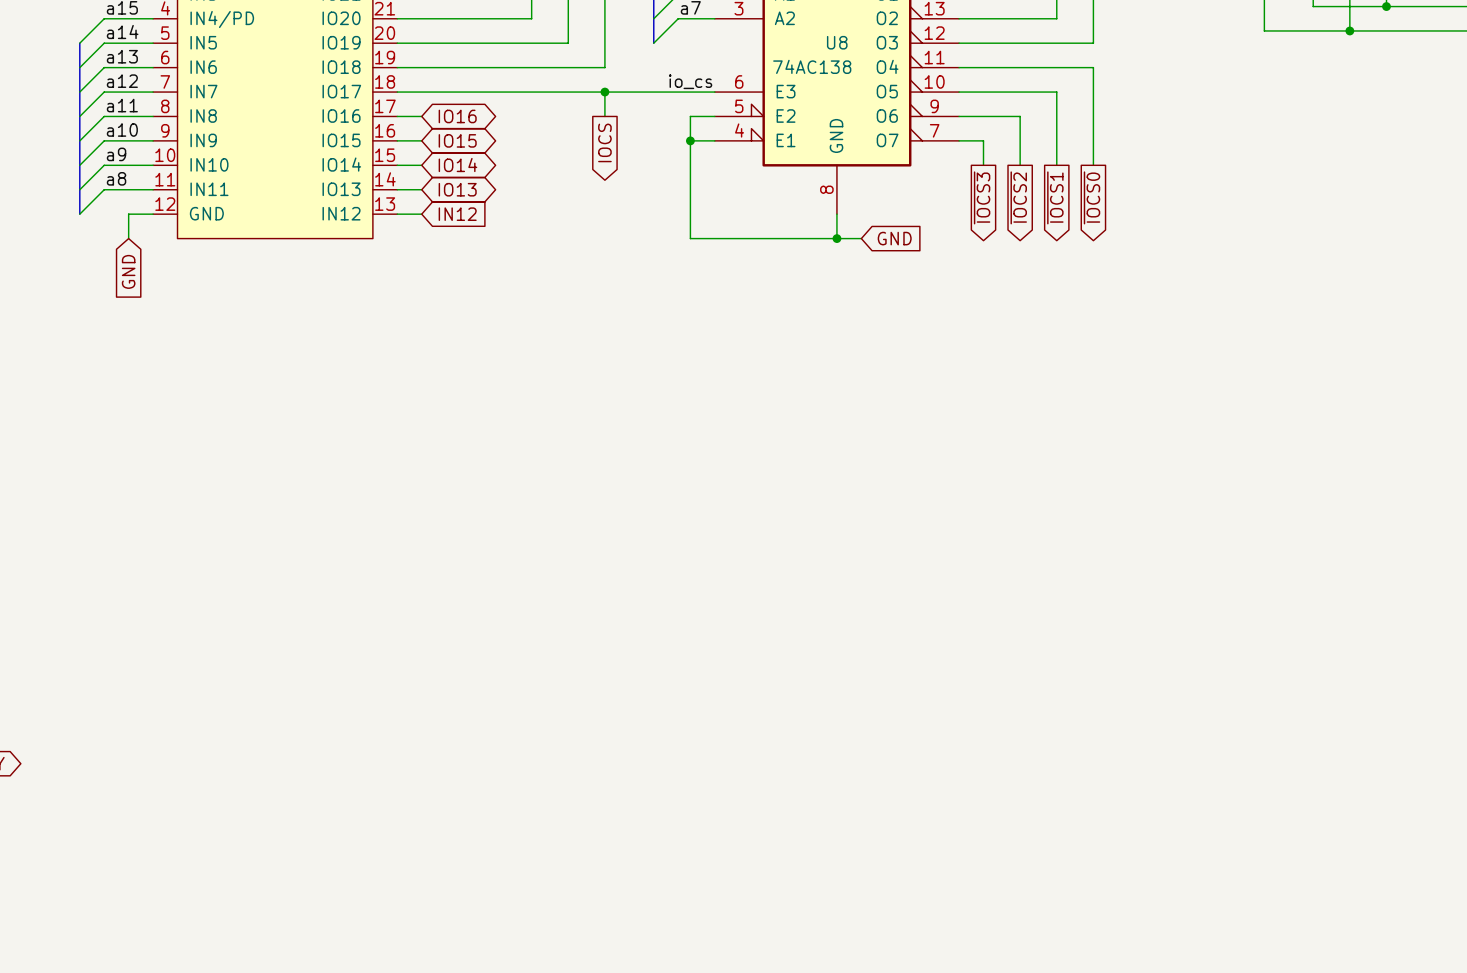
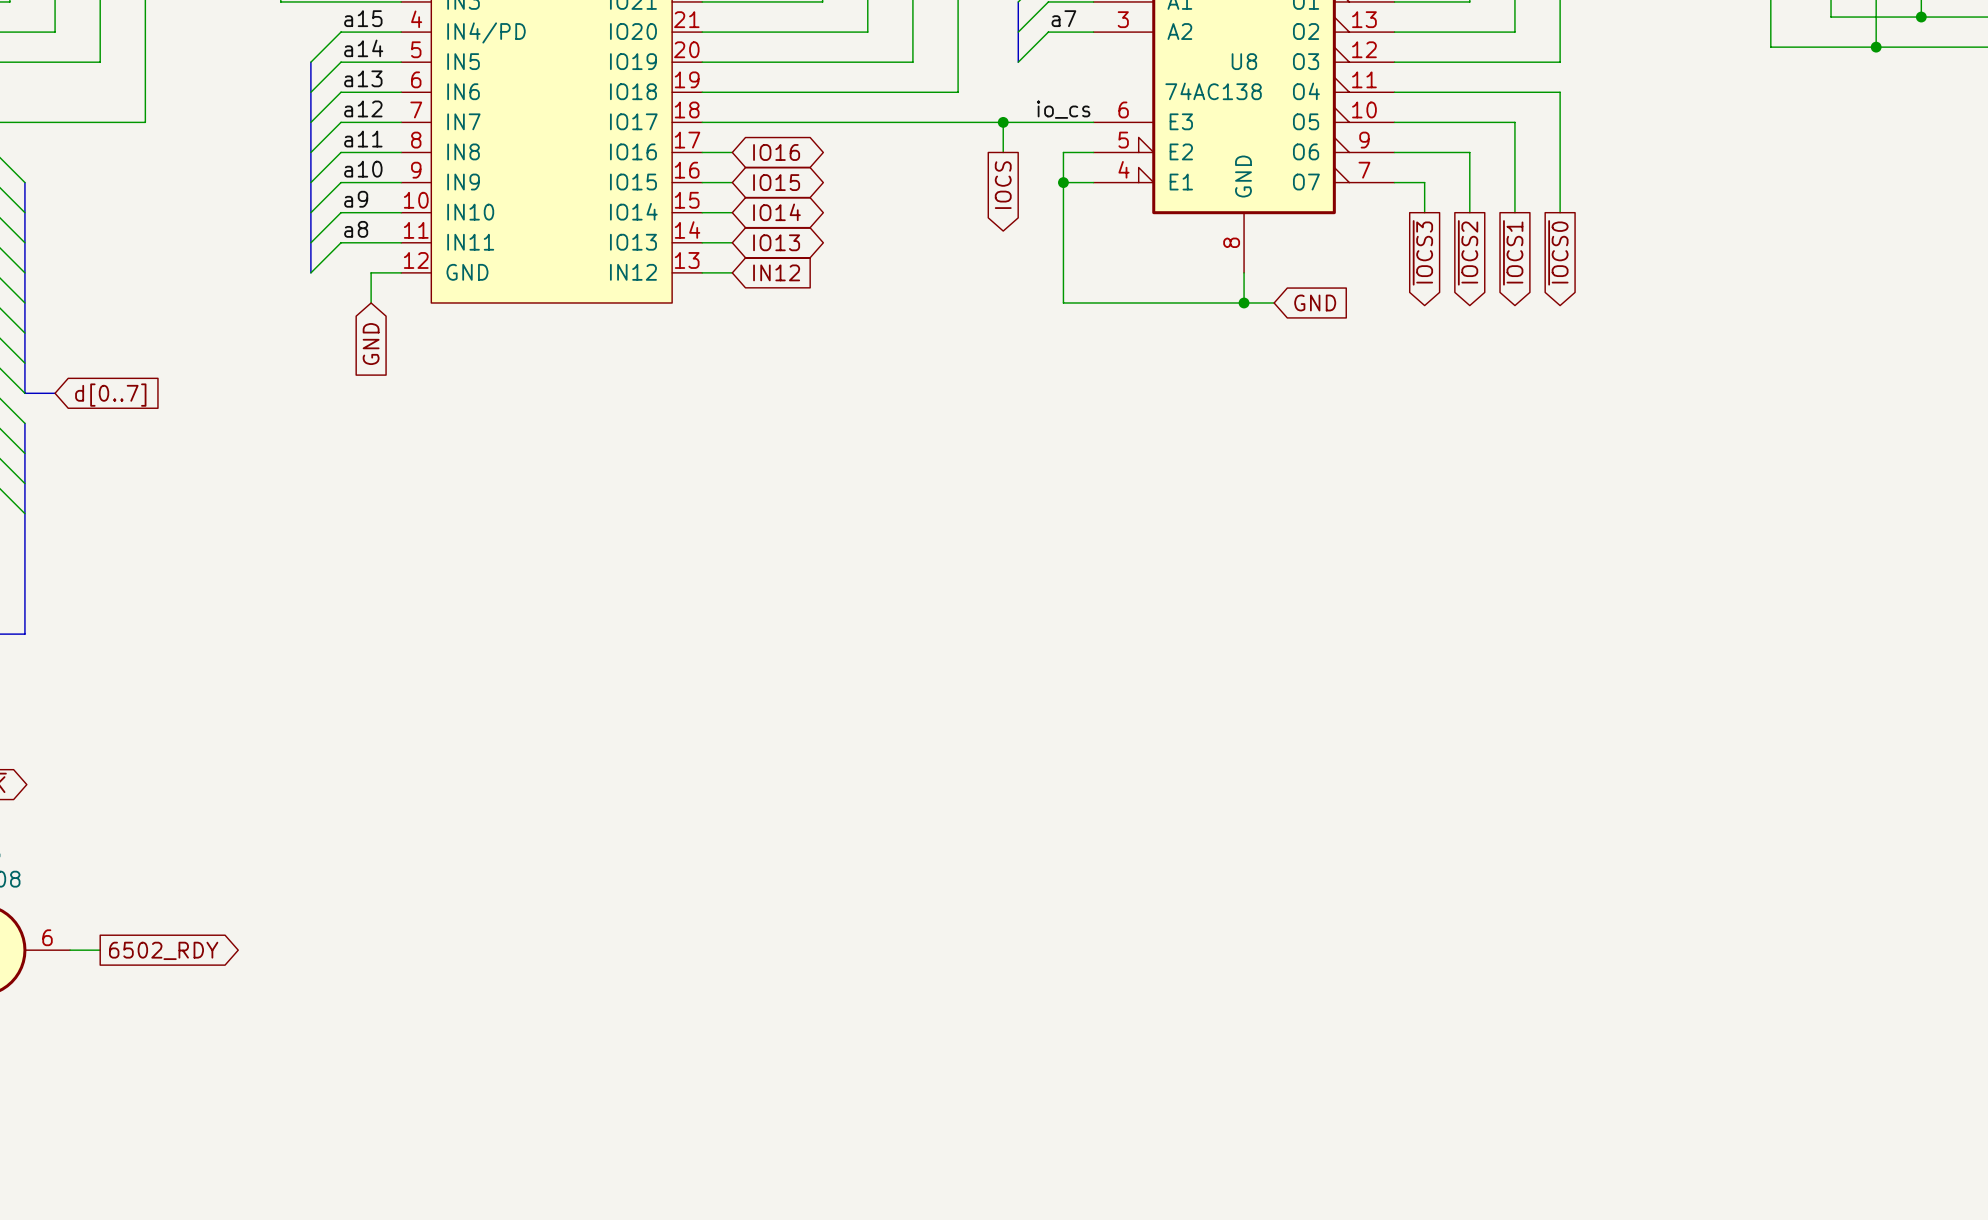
wire: (604, 92) (604, 116) -> (1003, 122) (1003, 152)
junction position: (604, 92) -> (1003, 122)
global label position: IOCS (604, 142) -> IOCS (1003, 185)

